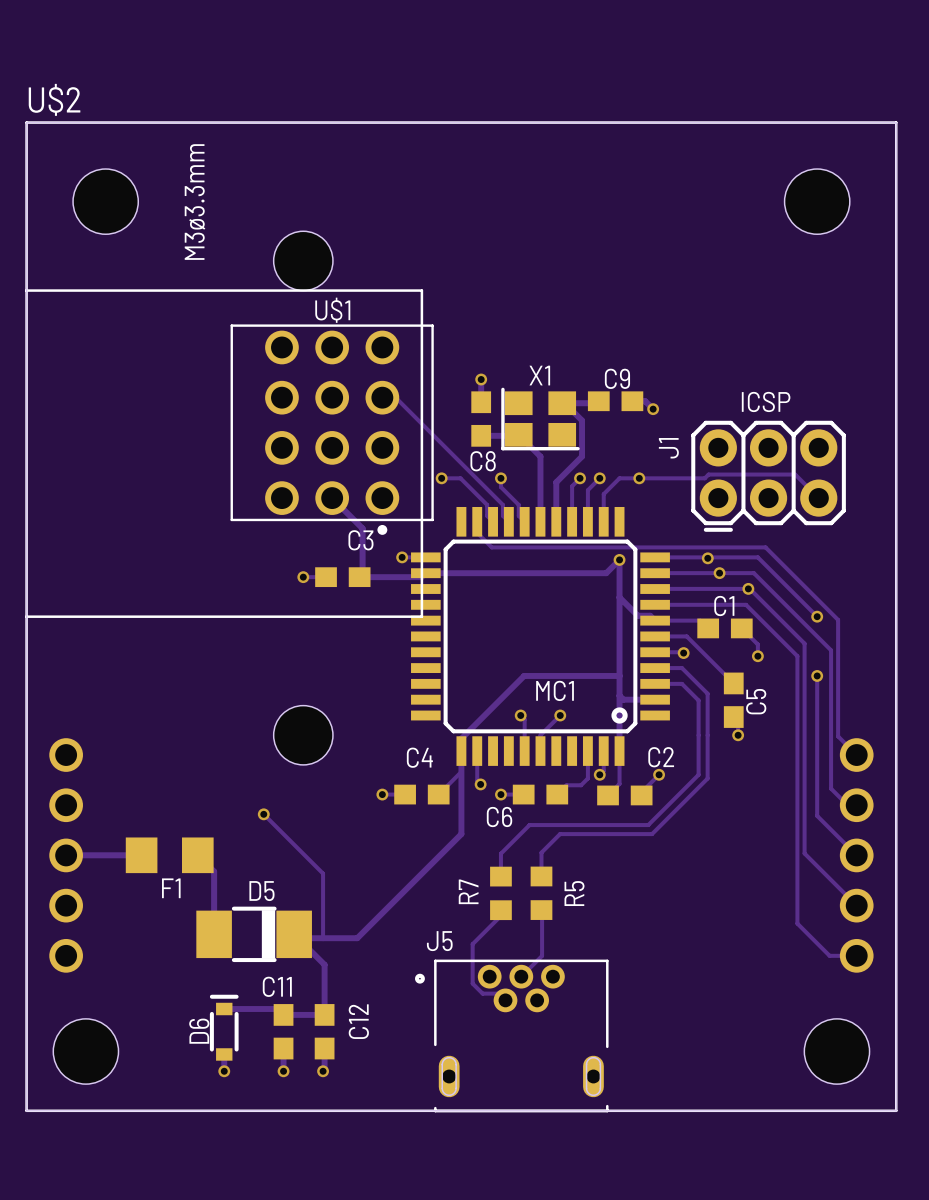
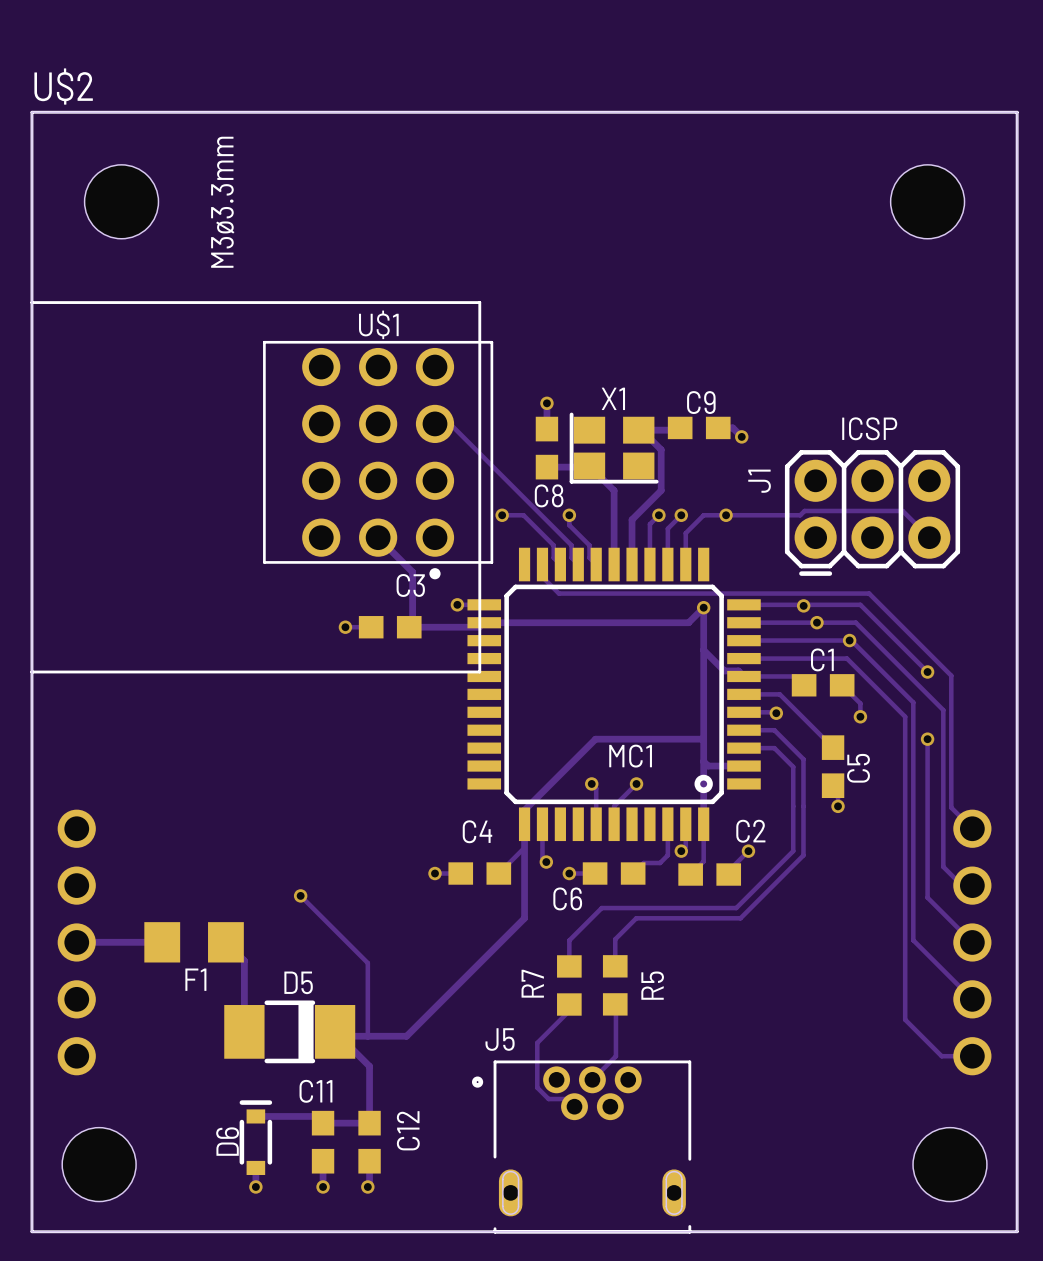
hole: (303, 260) -> none
hole: (303, 735) -> none

